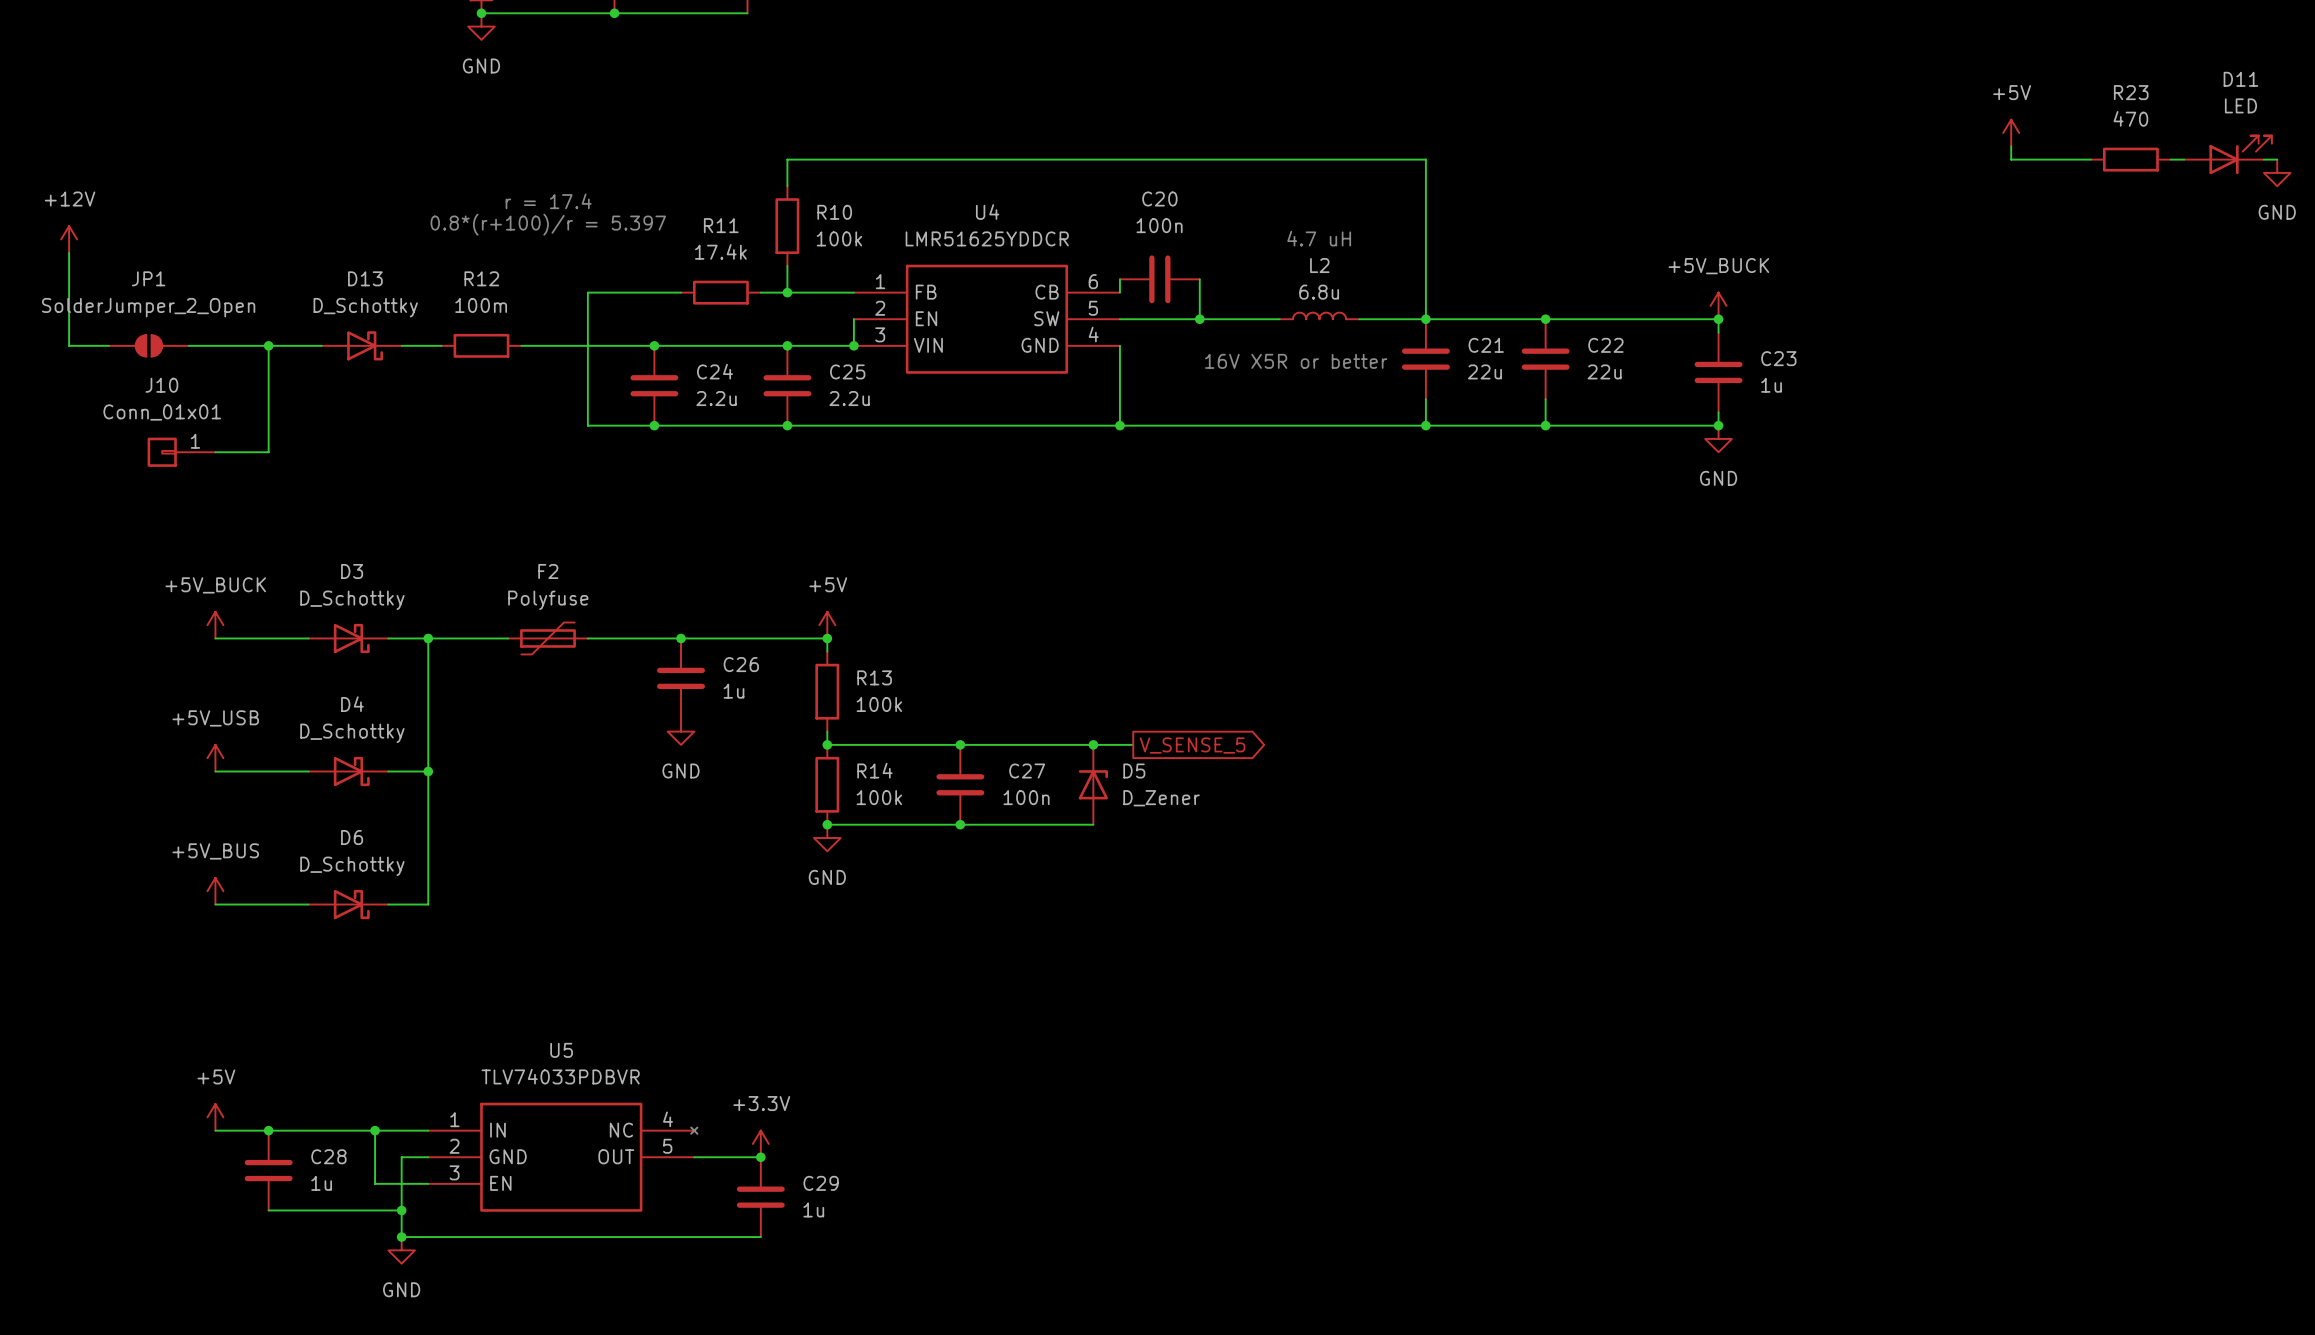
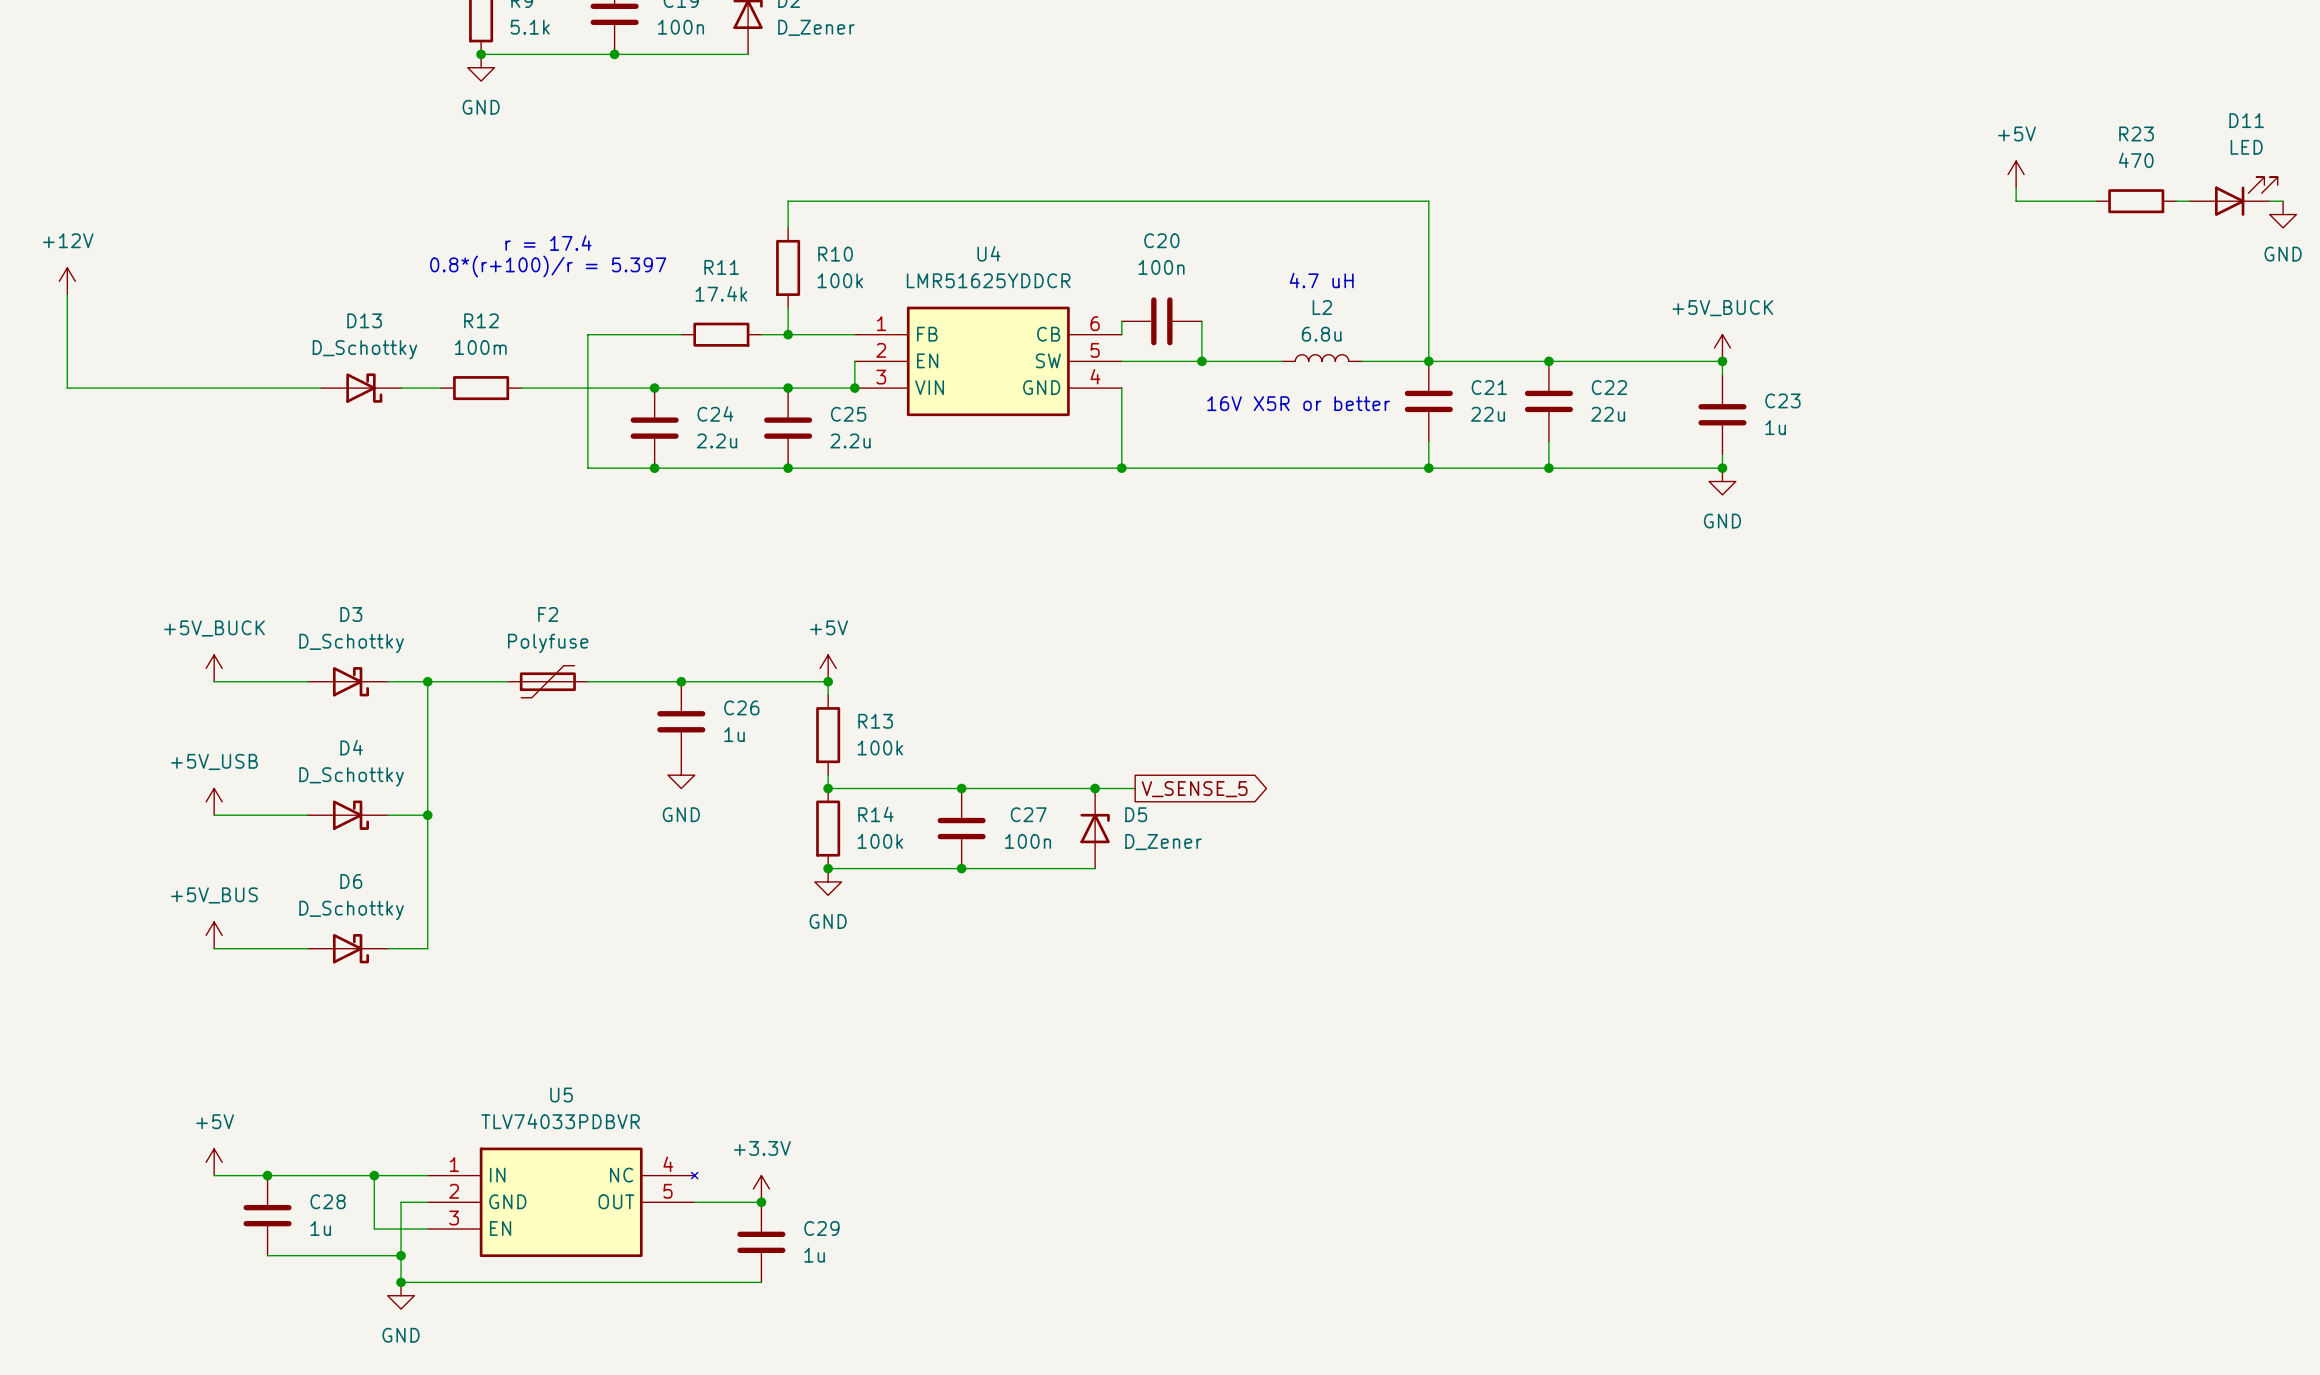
JP1: SolderJumper_2_Open (148, 345) -> none
wire: (268, 345) (268, 452) (215, 452) -> none
junction: (268, 345) -> none
J10: Conn_01x01 (181, 452) -> none

